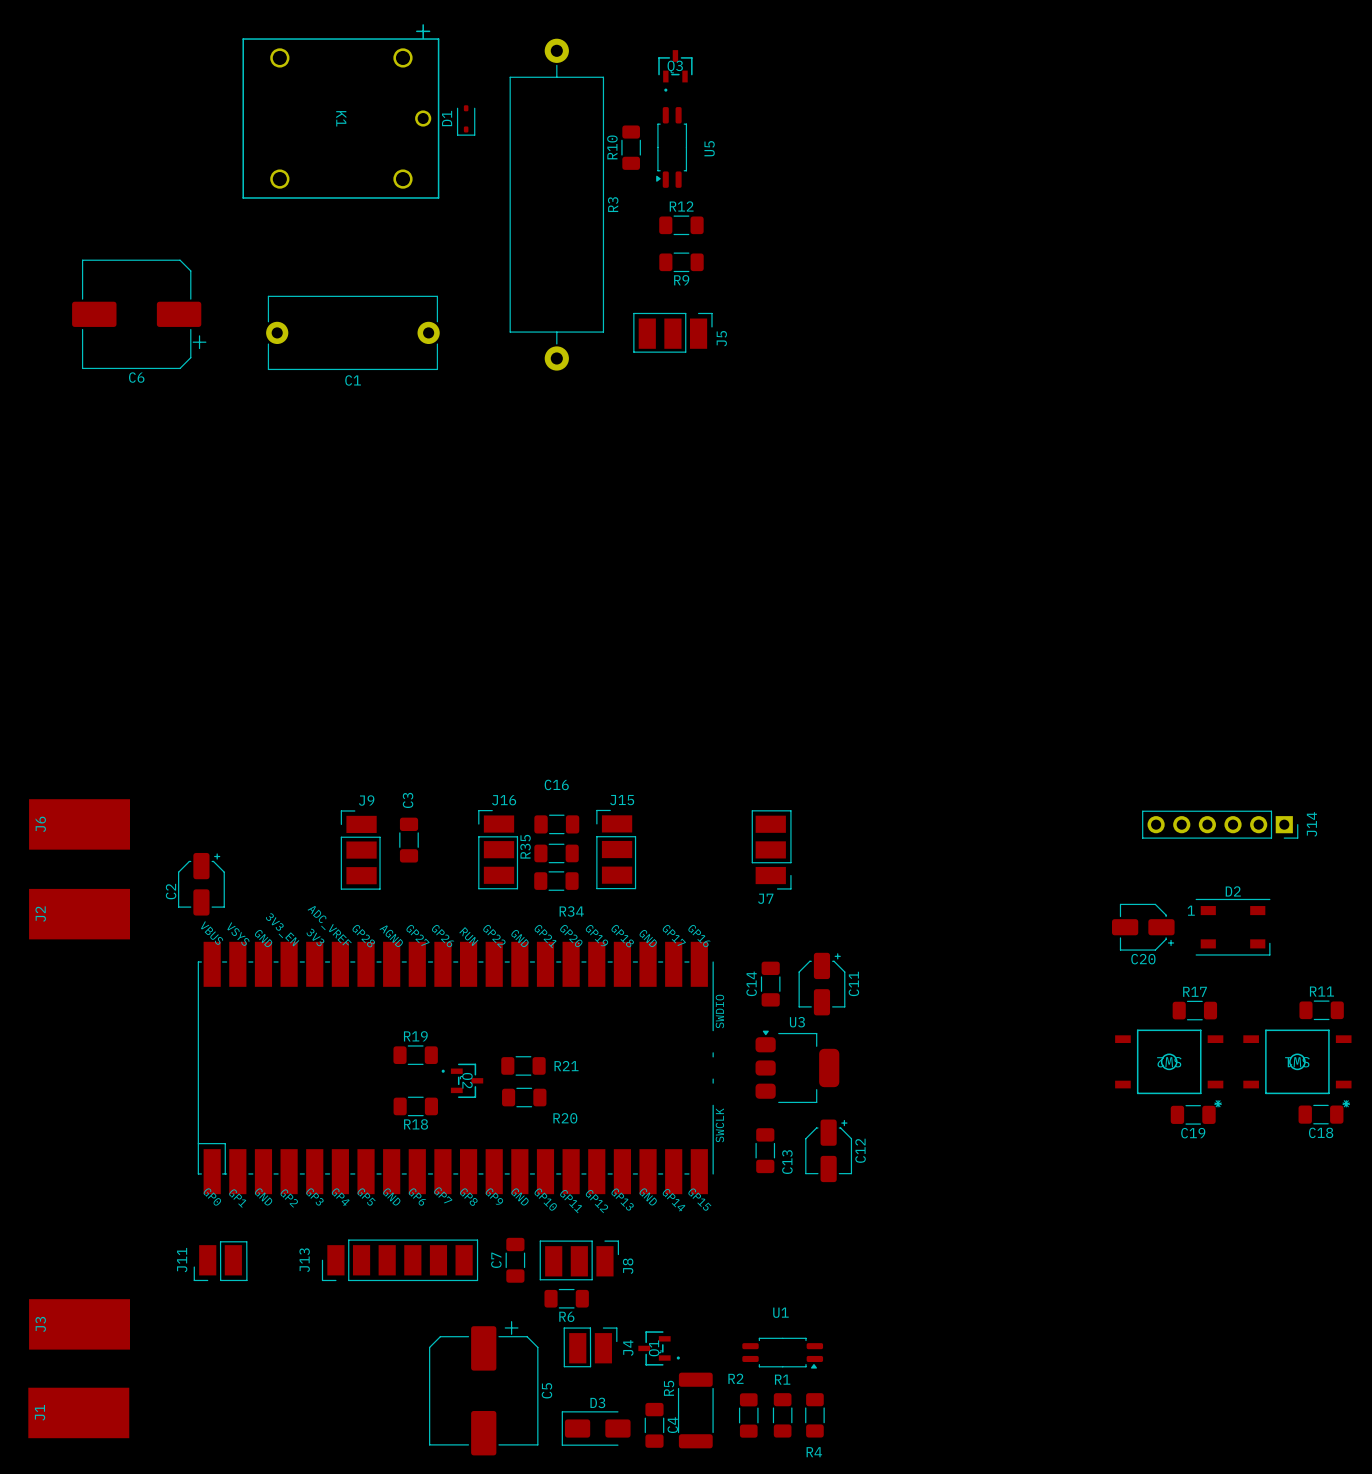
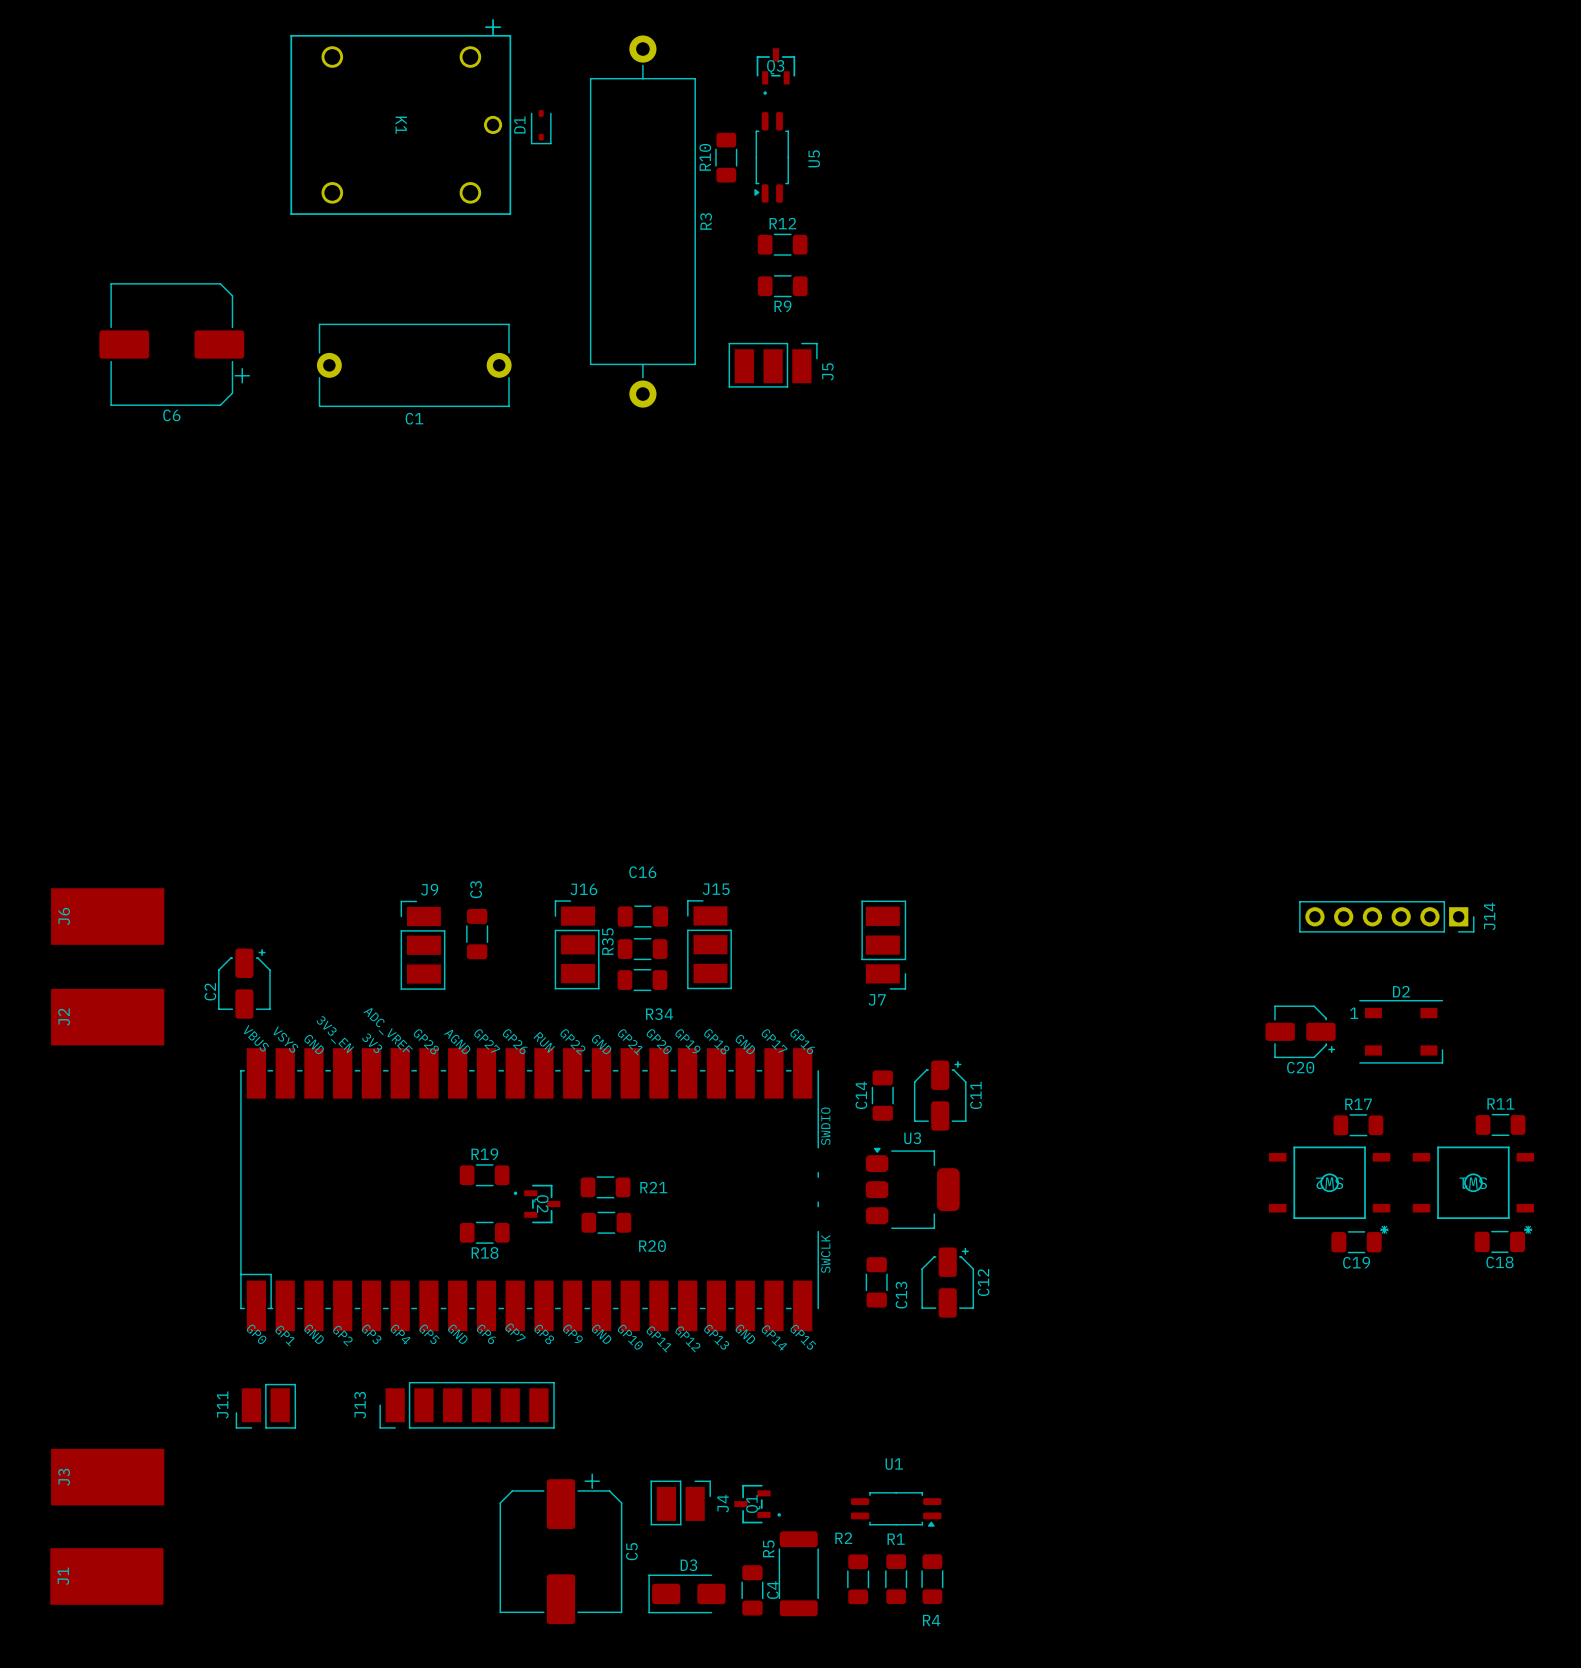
C7: (515, 1260) -> none
J8: (579, 1260) -> none
R6: (566, 1298) -> none

